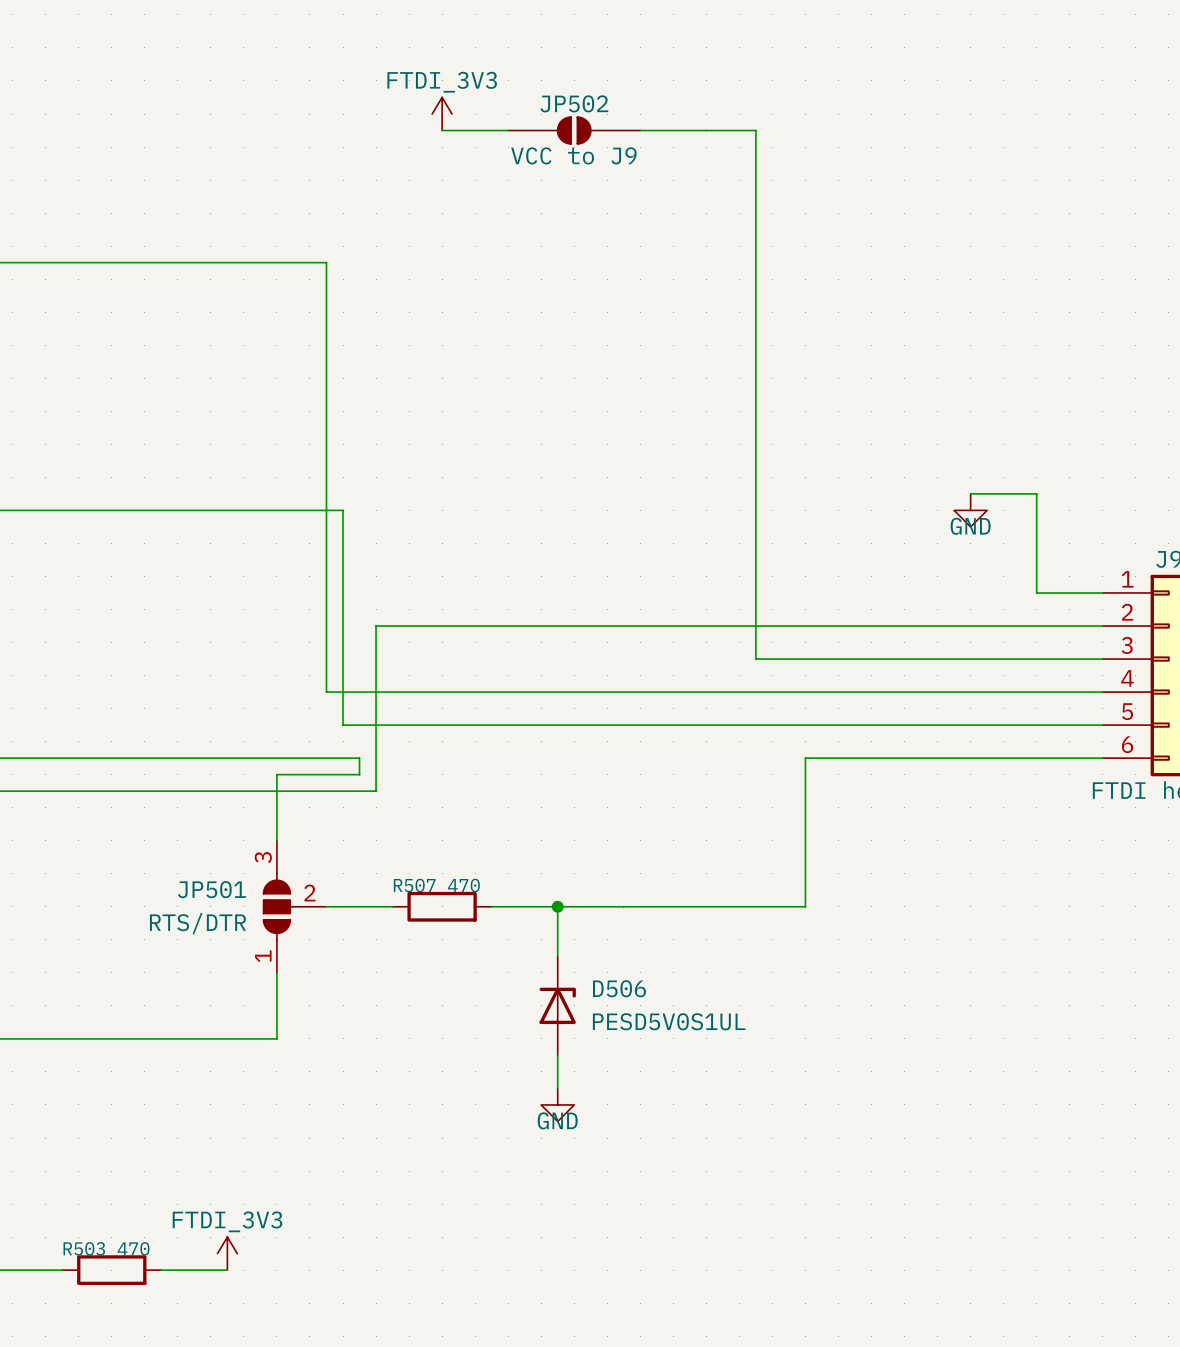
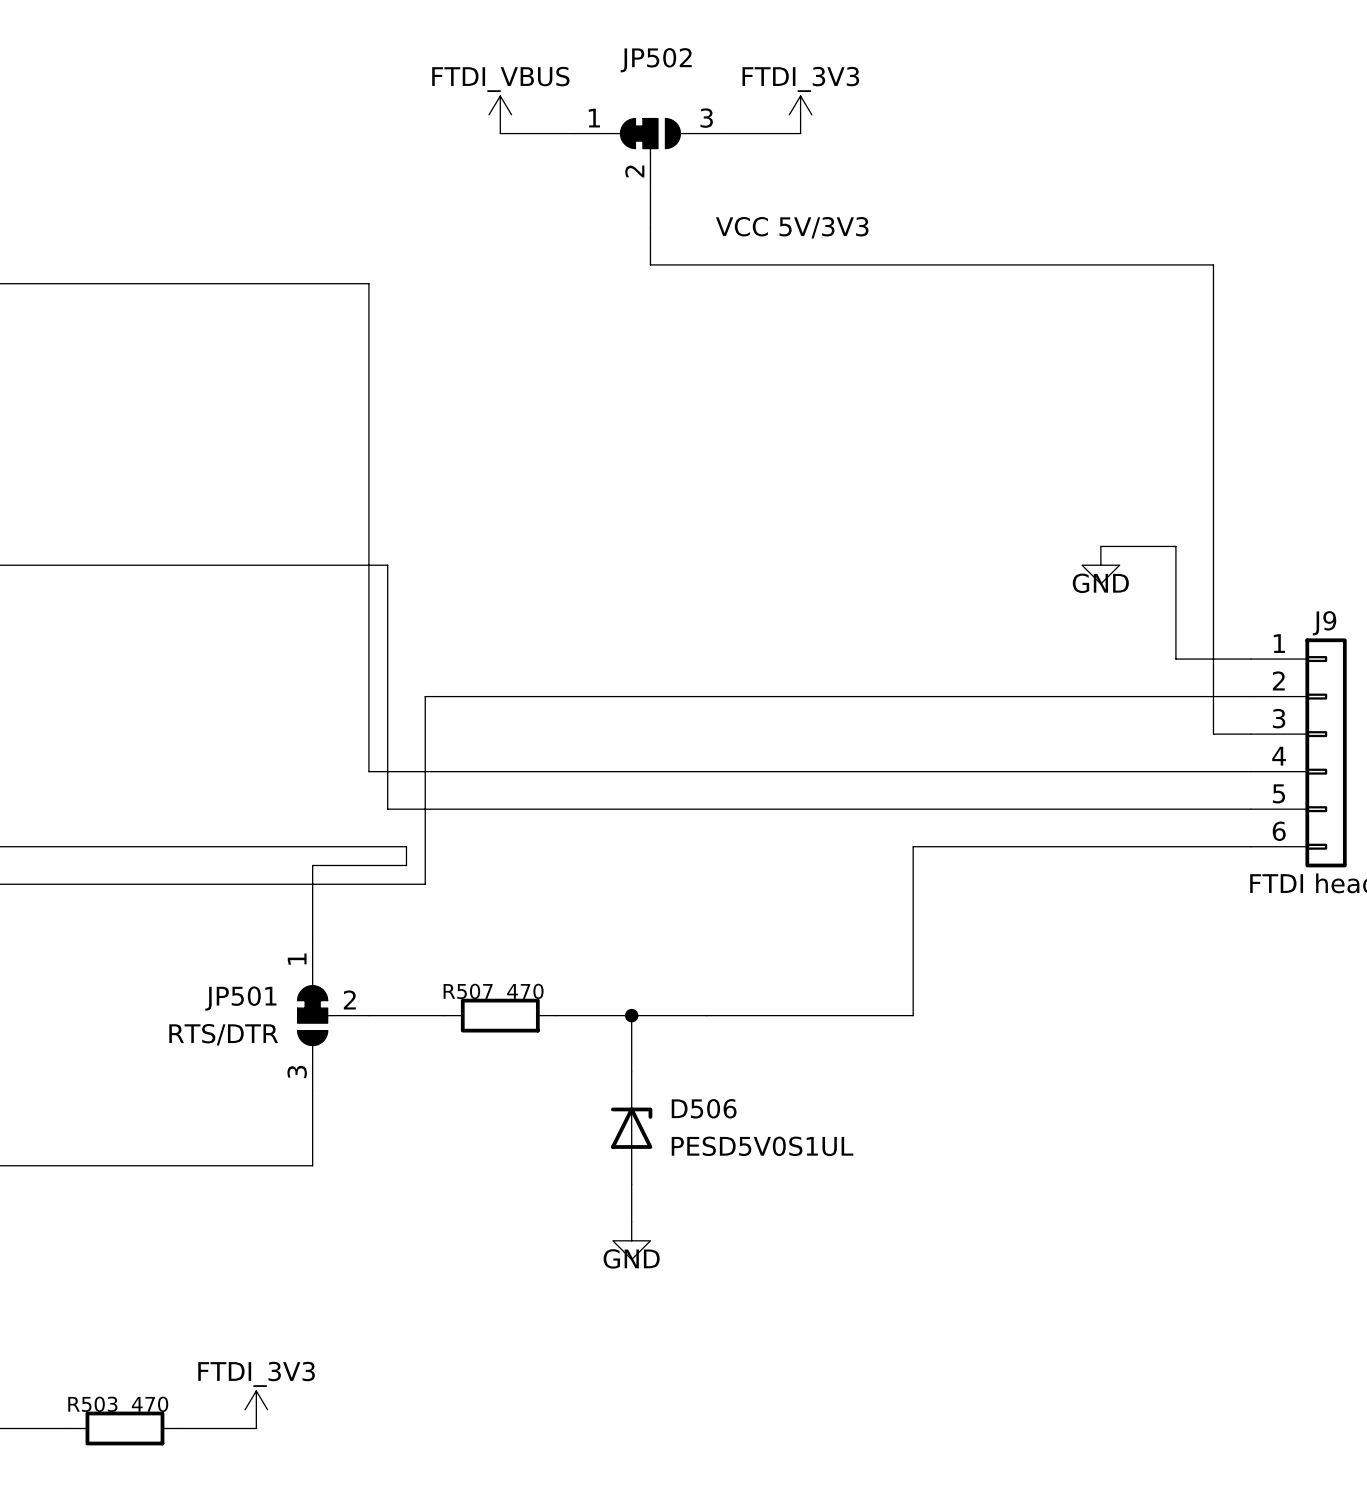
JP502 name position: JP502 (574, 103) -> JP502 (656, 60)
power symbol: FTDI_3V3 (442, 114) -> FTDI_VBUS (500, 114)
power symbol: none -> FTDI_3V3 (800, 114)
JP502 symbol: [508, 116, 641, 145] -> [575, 118, 726, 190]
wire: (706, 130) (755, 130) (755, 659) (1069, 659) -> (650, 189) (650, 264) (1213, 264) (1213, 734)
JP502 value: VCC to J9 (573, 155) -> VCC 5V/3V3 (792, 227)
JP501 symbol: [262, 840, 327, 973] -> [297, 940, 369, 1091]

